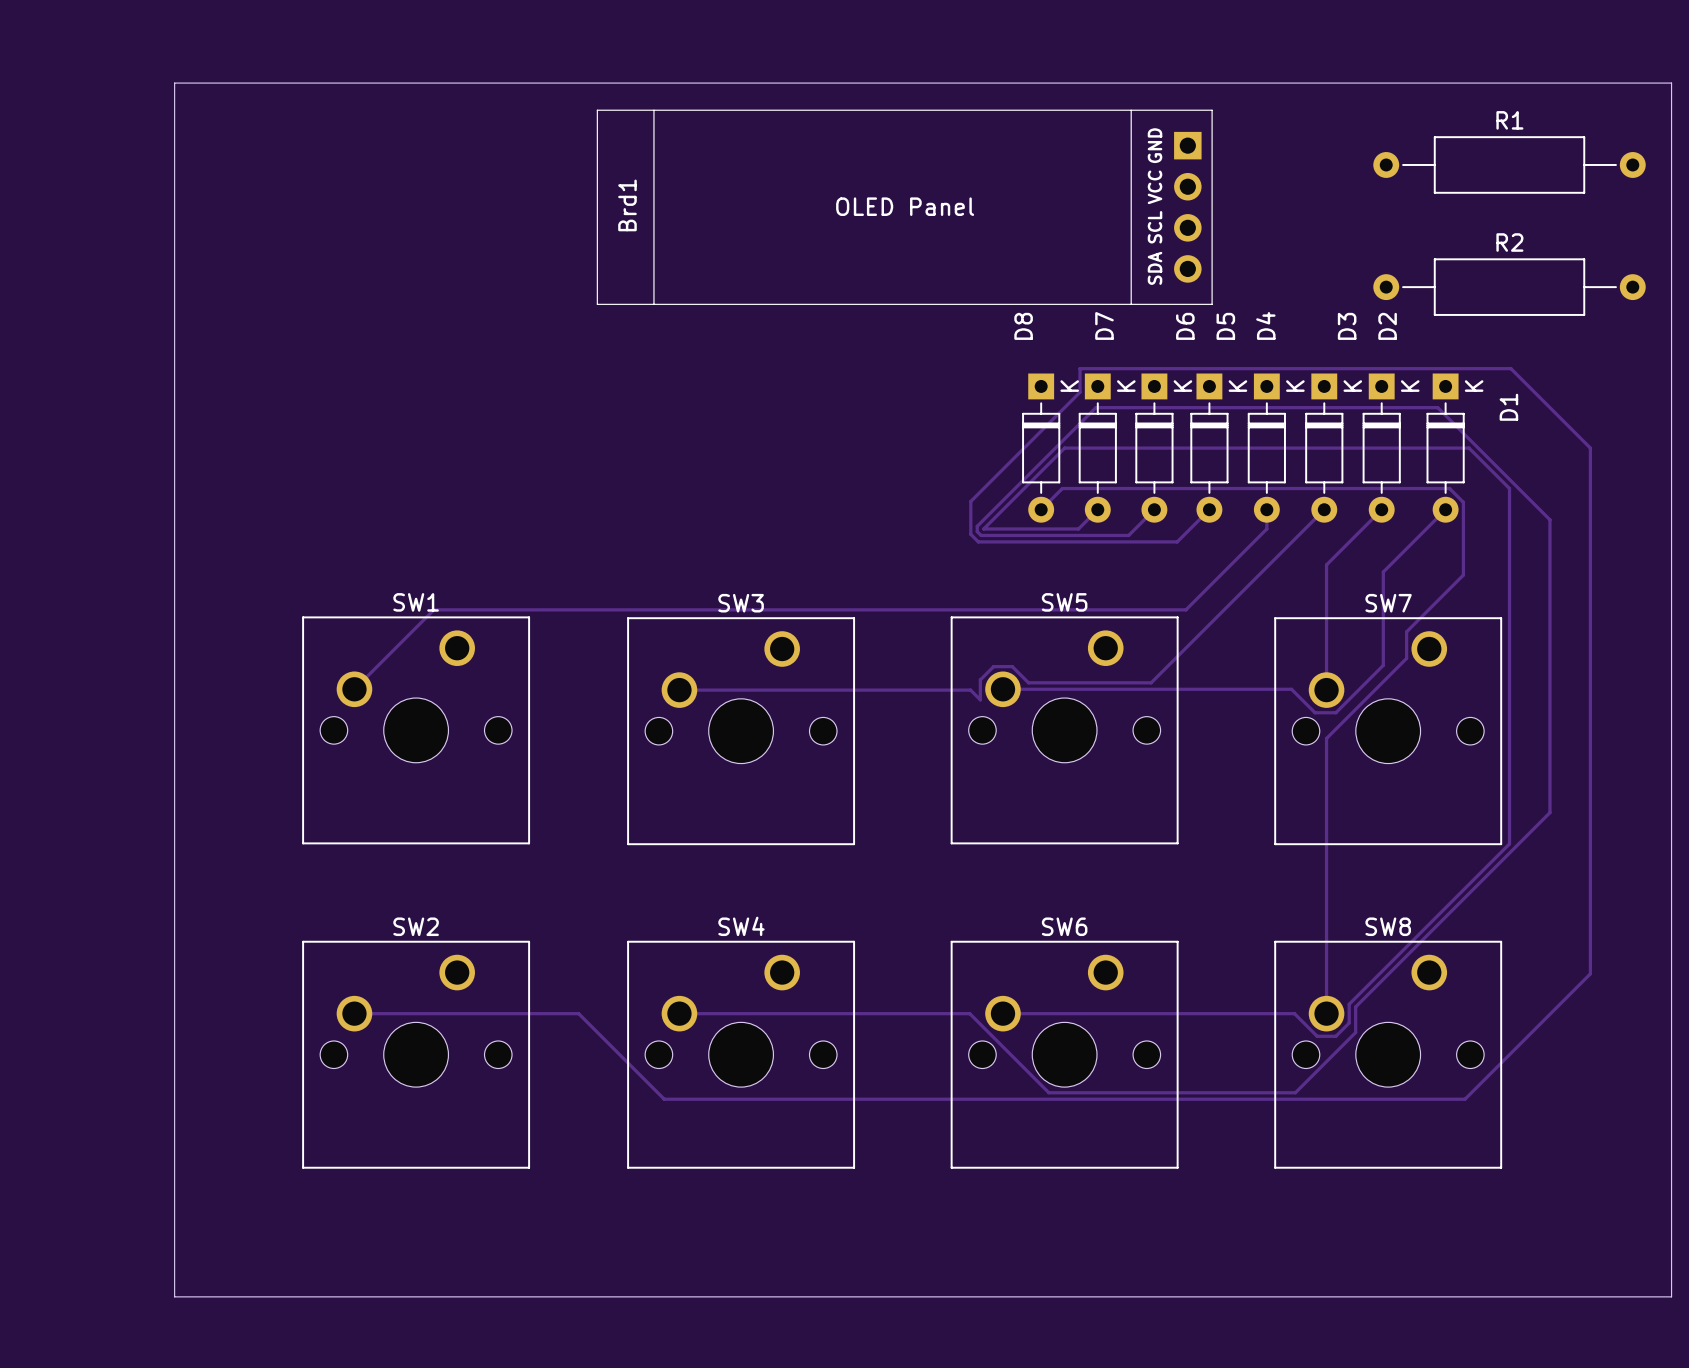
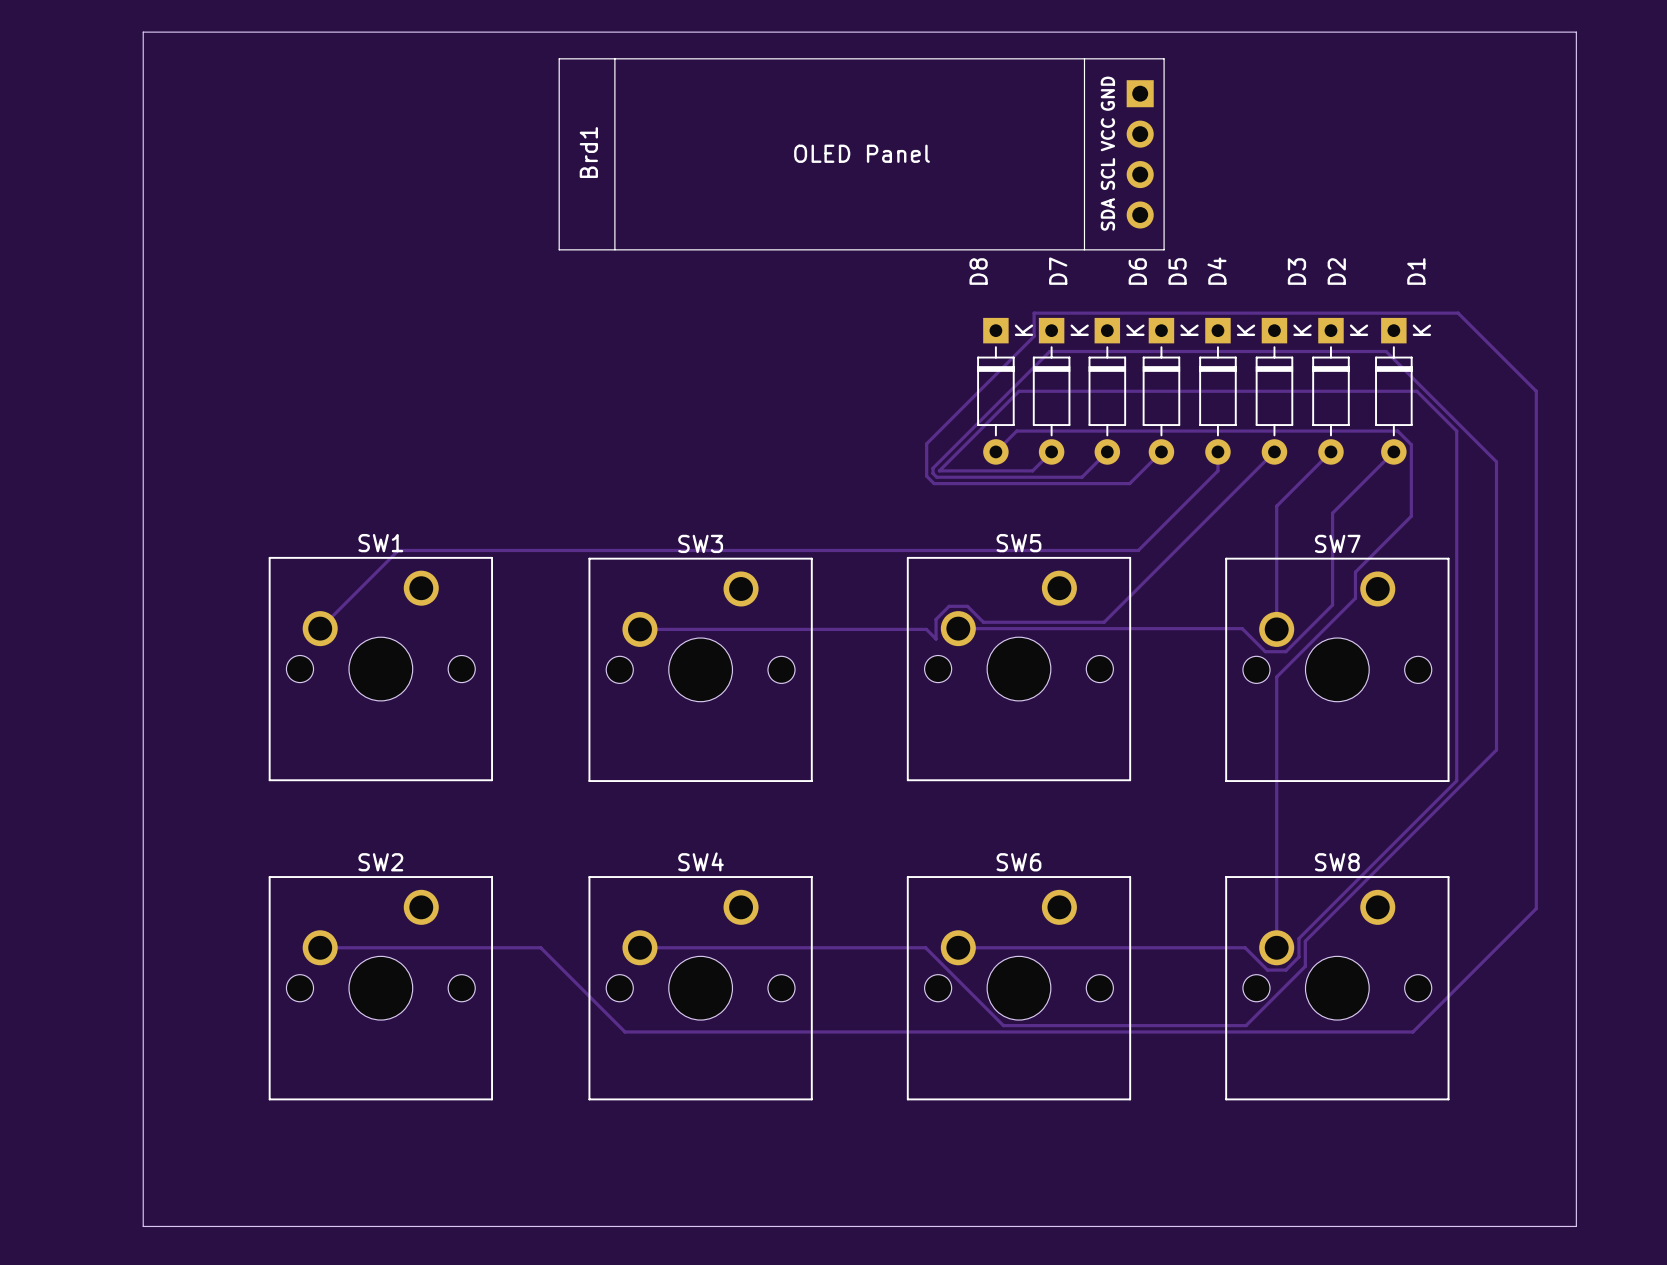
board edge: (1631, 83) (1671, 83) (1671, 1296) (1631, 1296) -> (1576, 32) (1576, 1226)
R1: (1509, 164) -> none
R2: (1509, 287) -> none
D1 name position: D1 (1508, 407) -> D1 (1416, 271)

